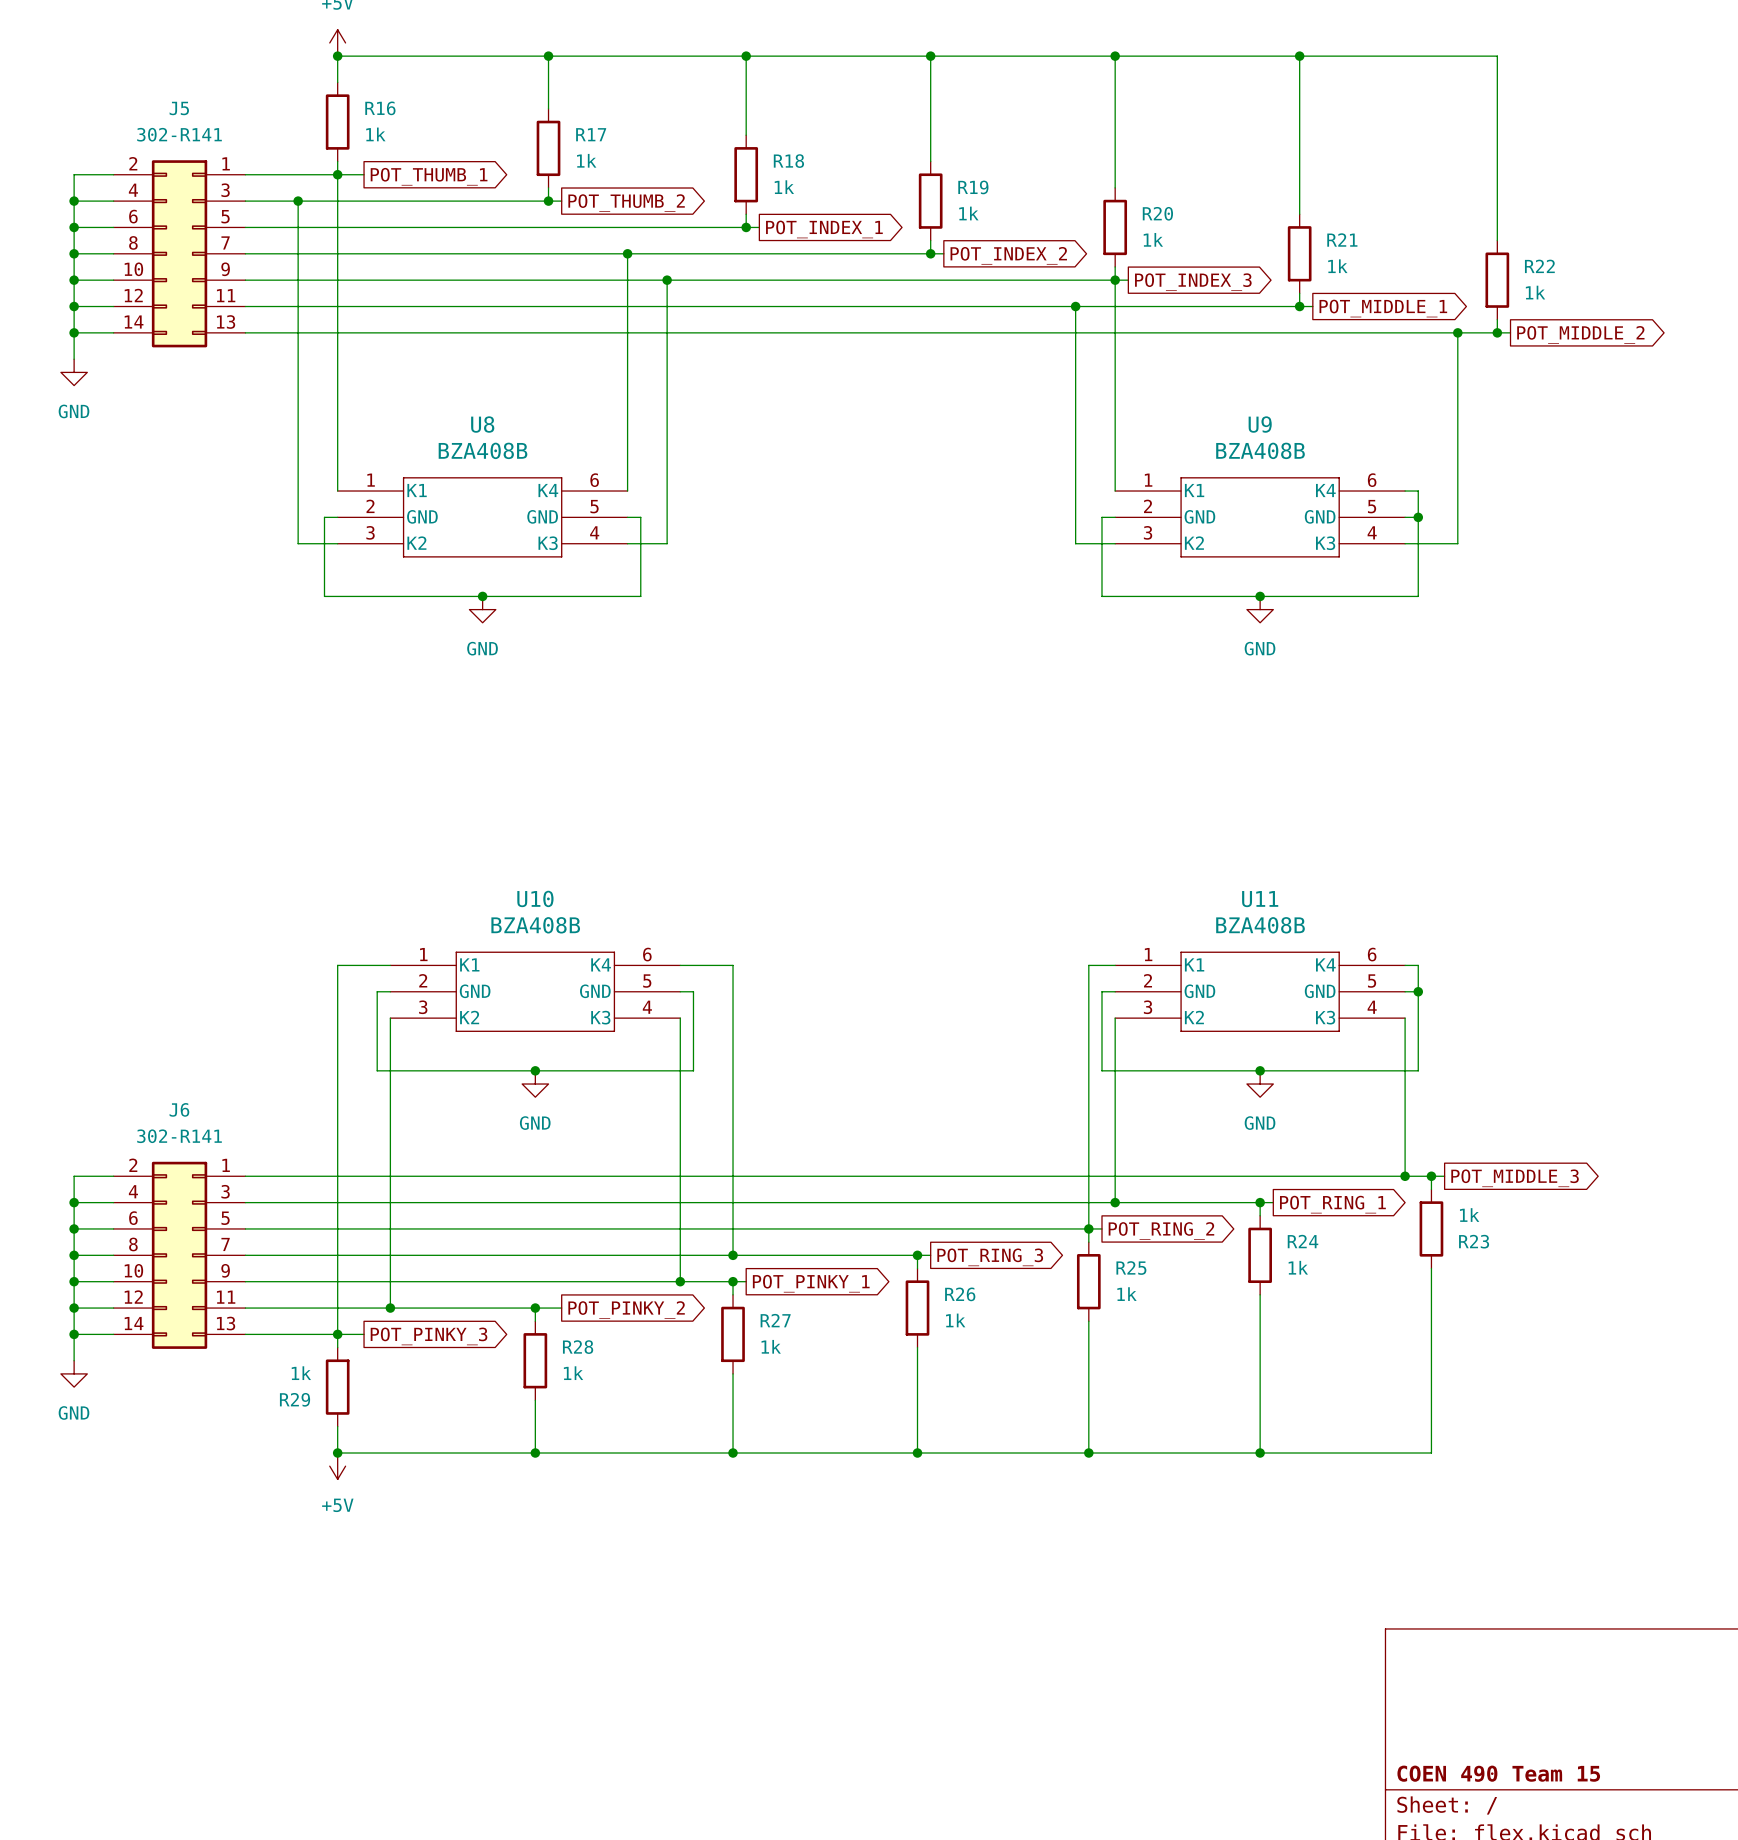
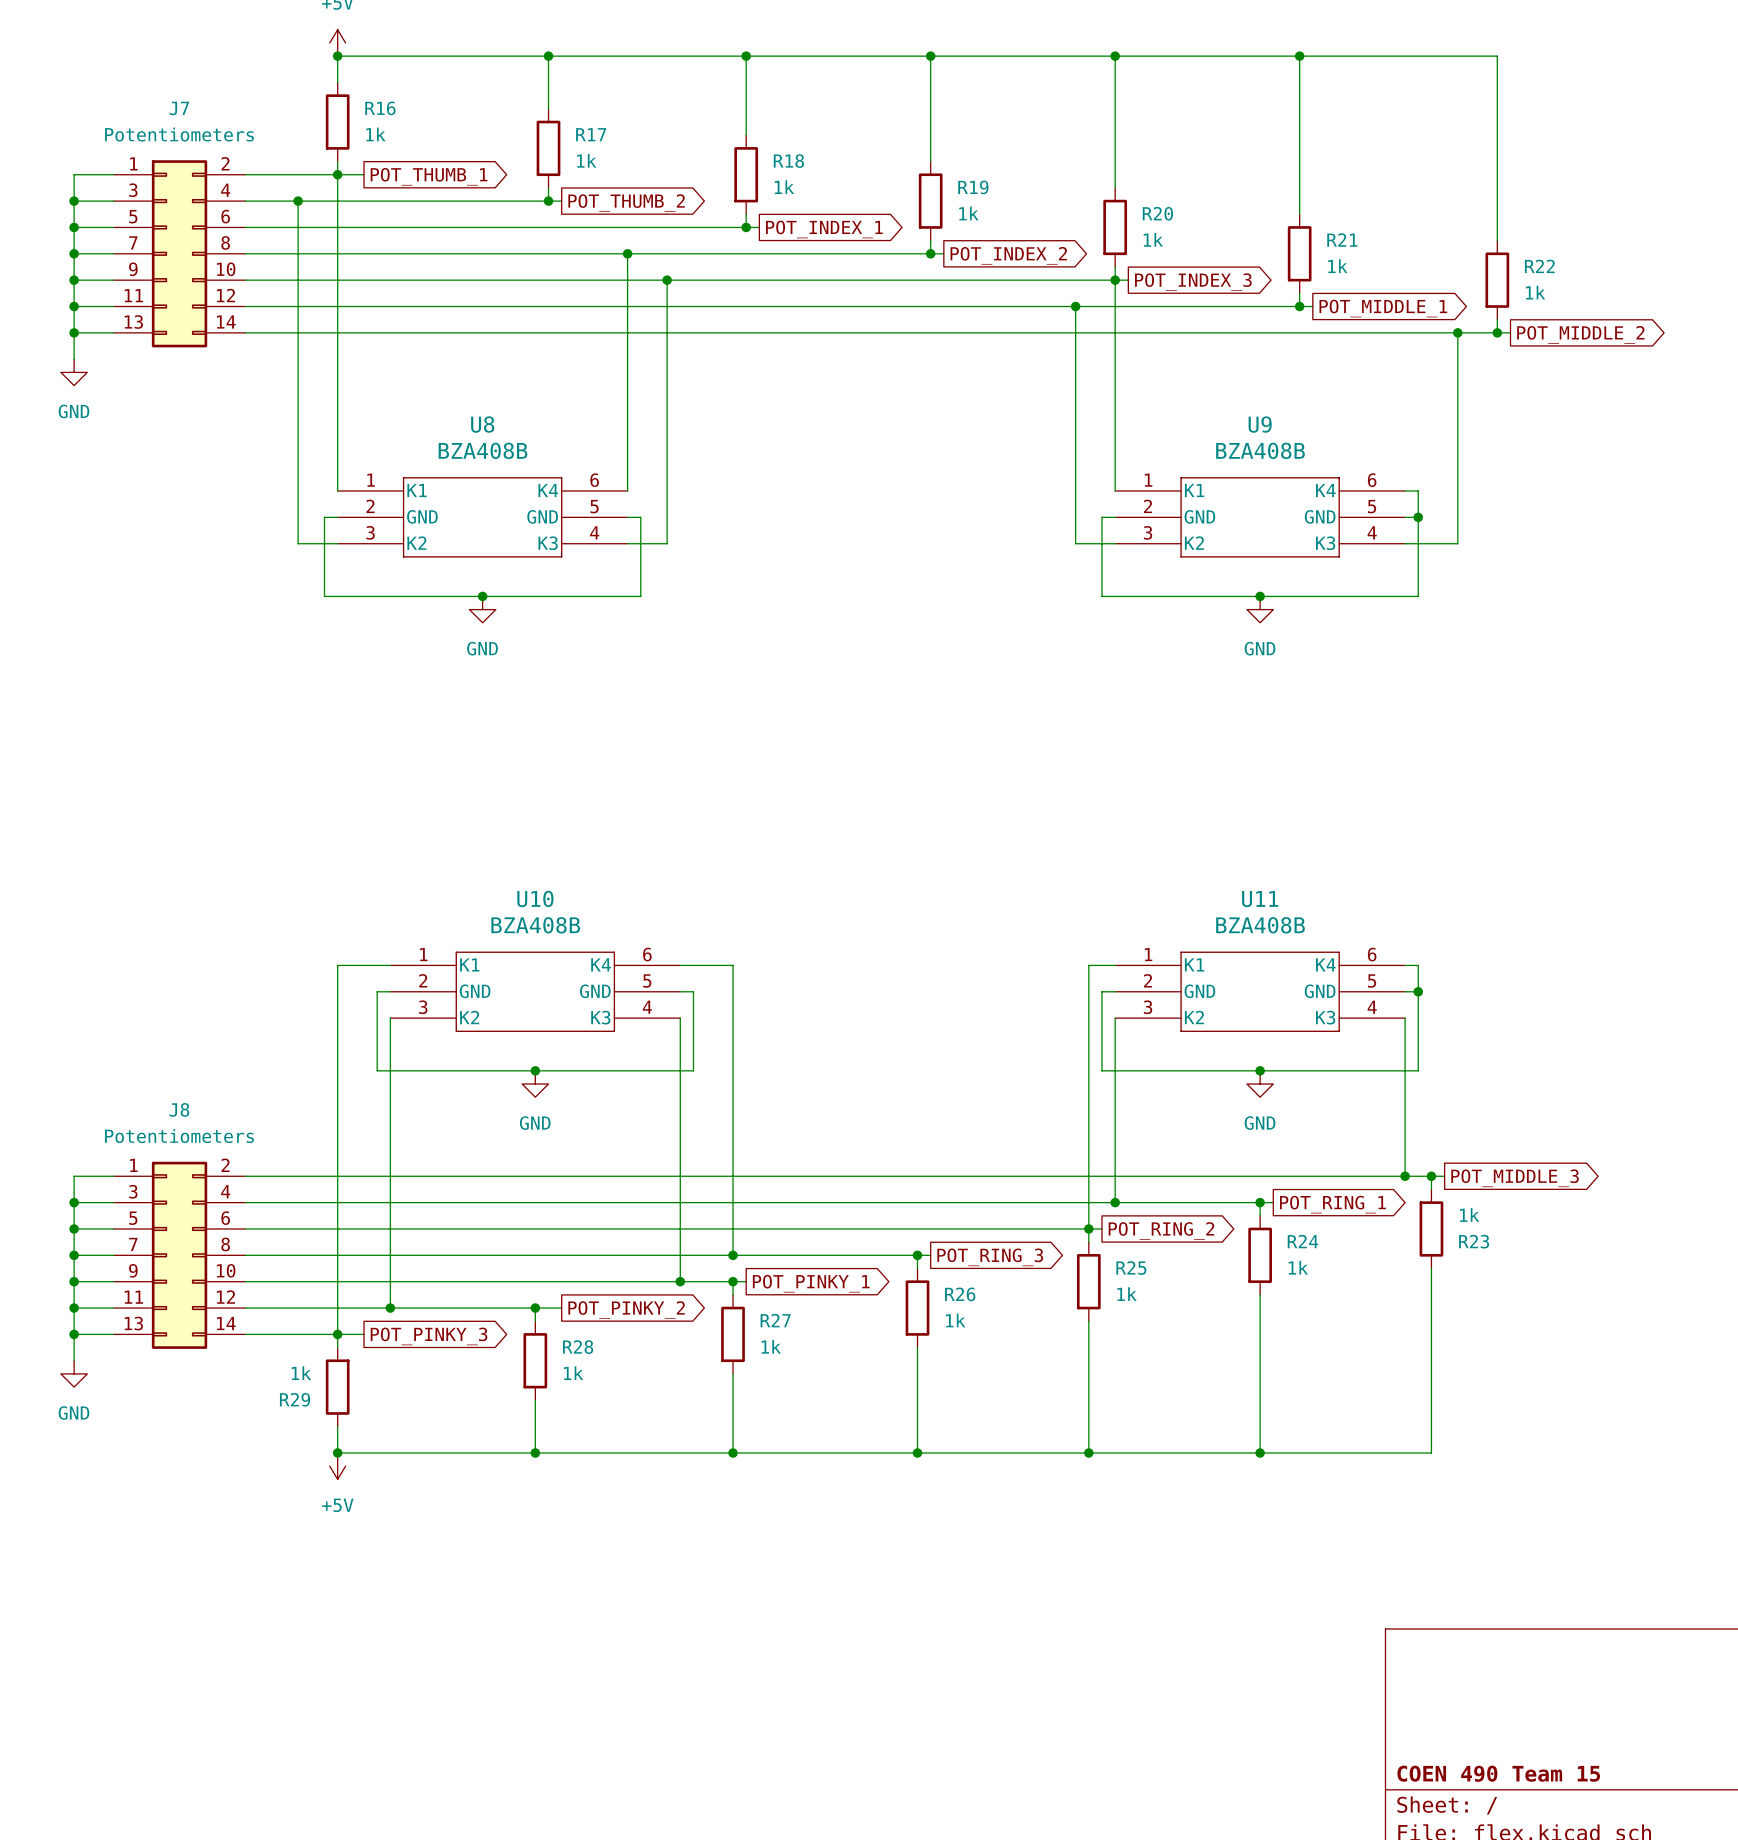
J5 name: J5 (179, 108) -> J7 (179, 108)
J5 value: 302-R141 (179, 134) -> Potentiometers (179, 134)
J5 flip: as is (179, 253) -> left-right (179, 253)
J6 name: J6 (179, 1109) -> J8 (179, 1109)
J6 value: 302-R141 (179, 1136) -> Potentiometers (179, 1136)
J6 flip: as is (179, 1255) -> left-right (179, 1255)

